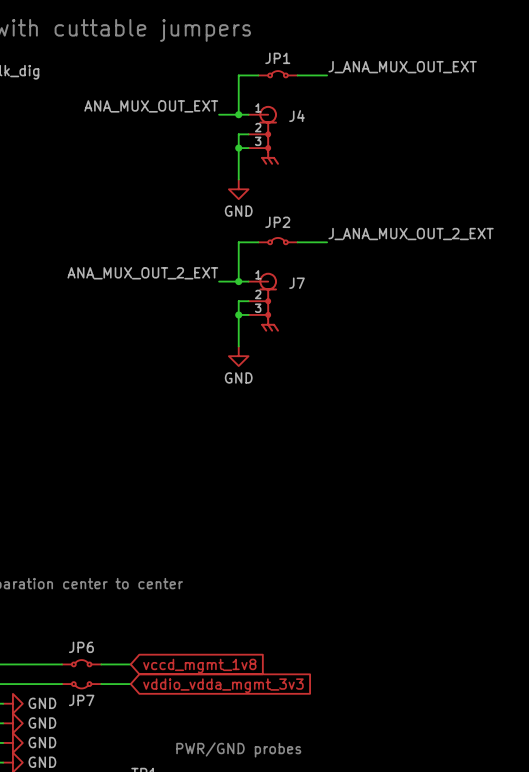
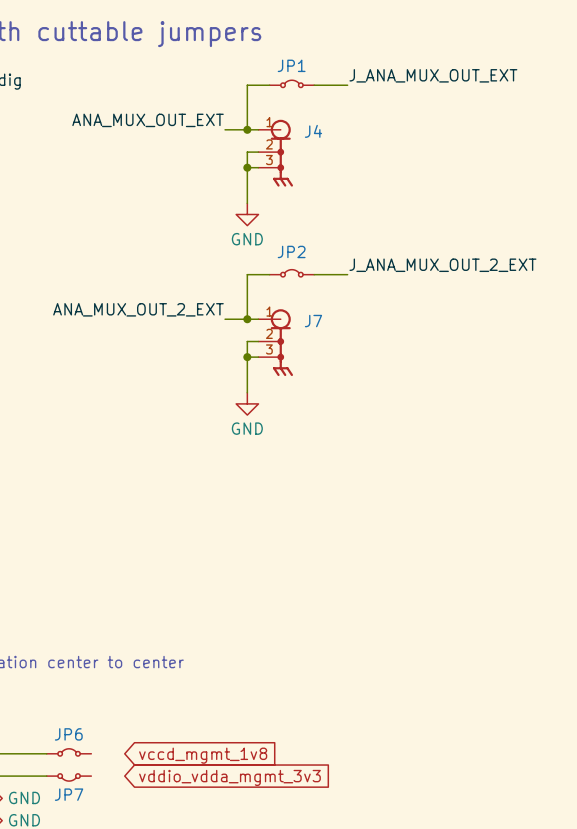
wire: (101, 664) (130, 664) -> none
wire: (101, 684) (130, 684) -> none

